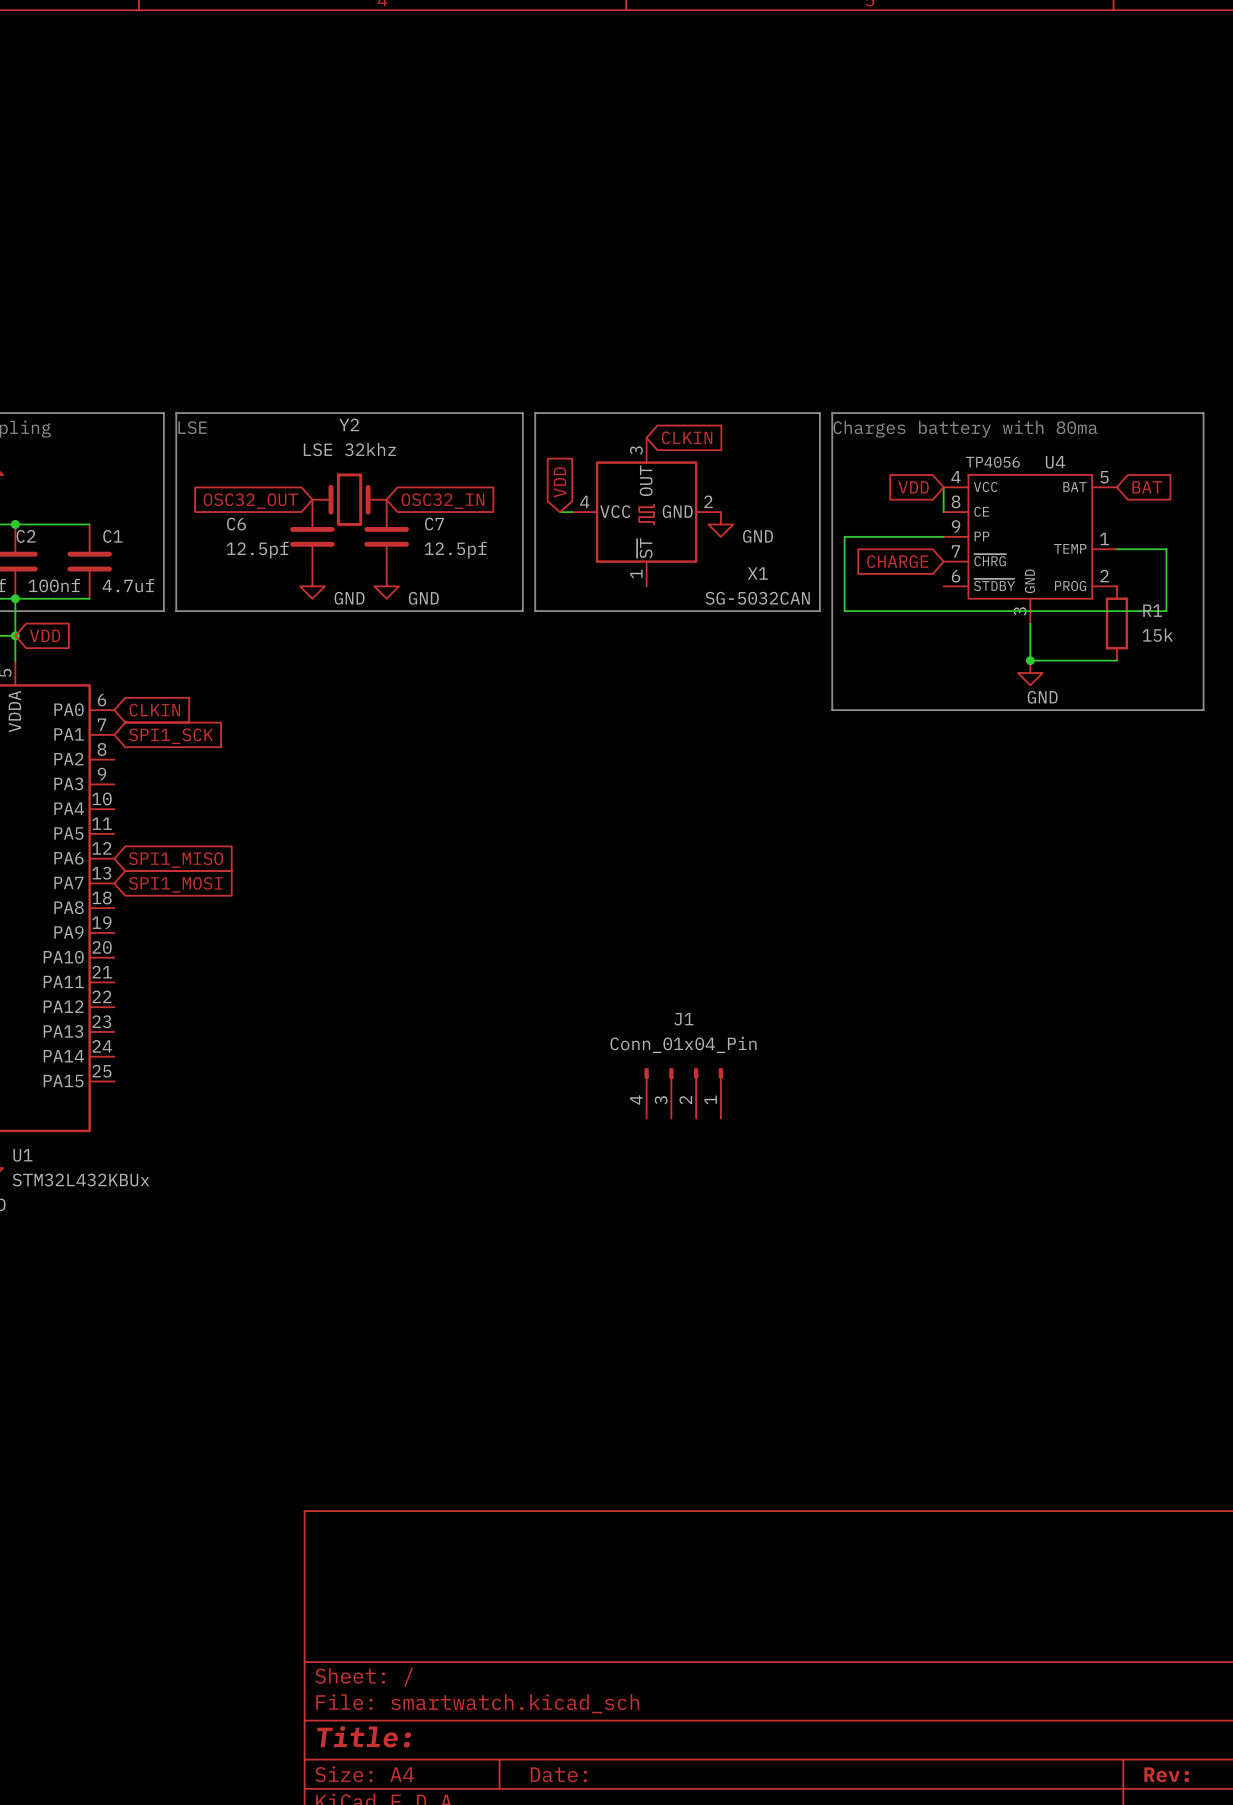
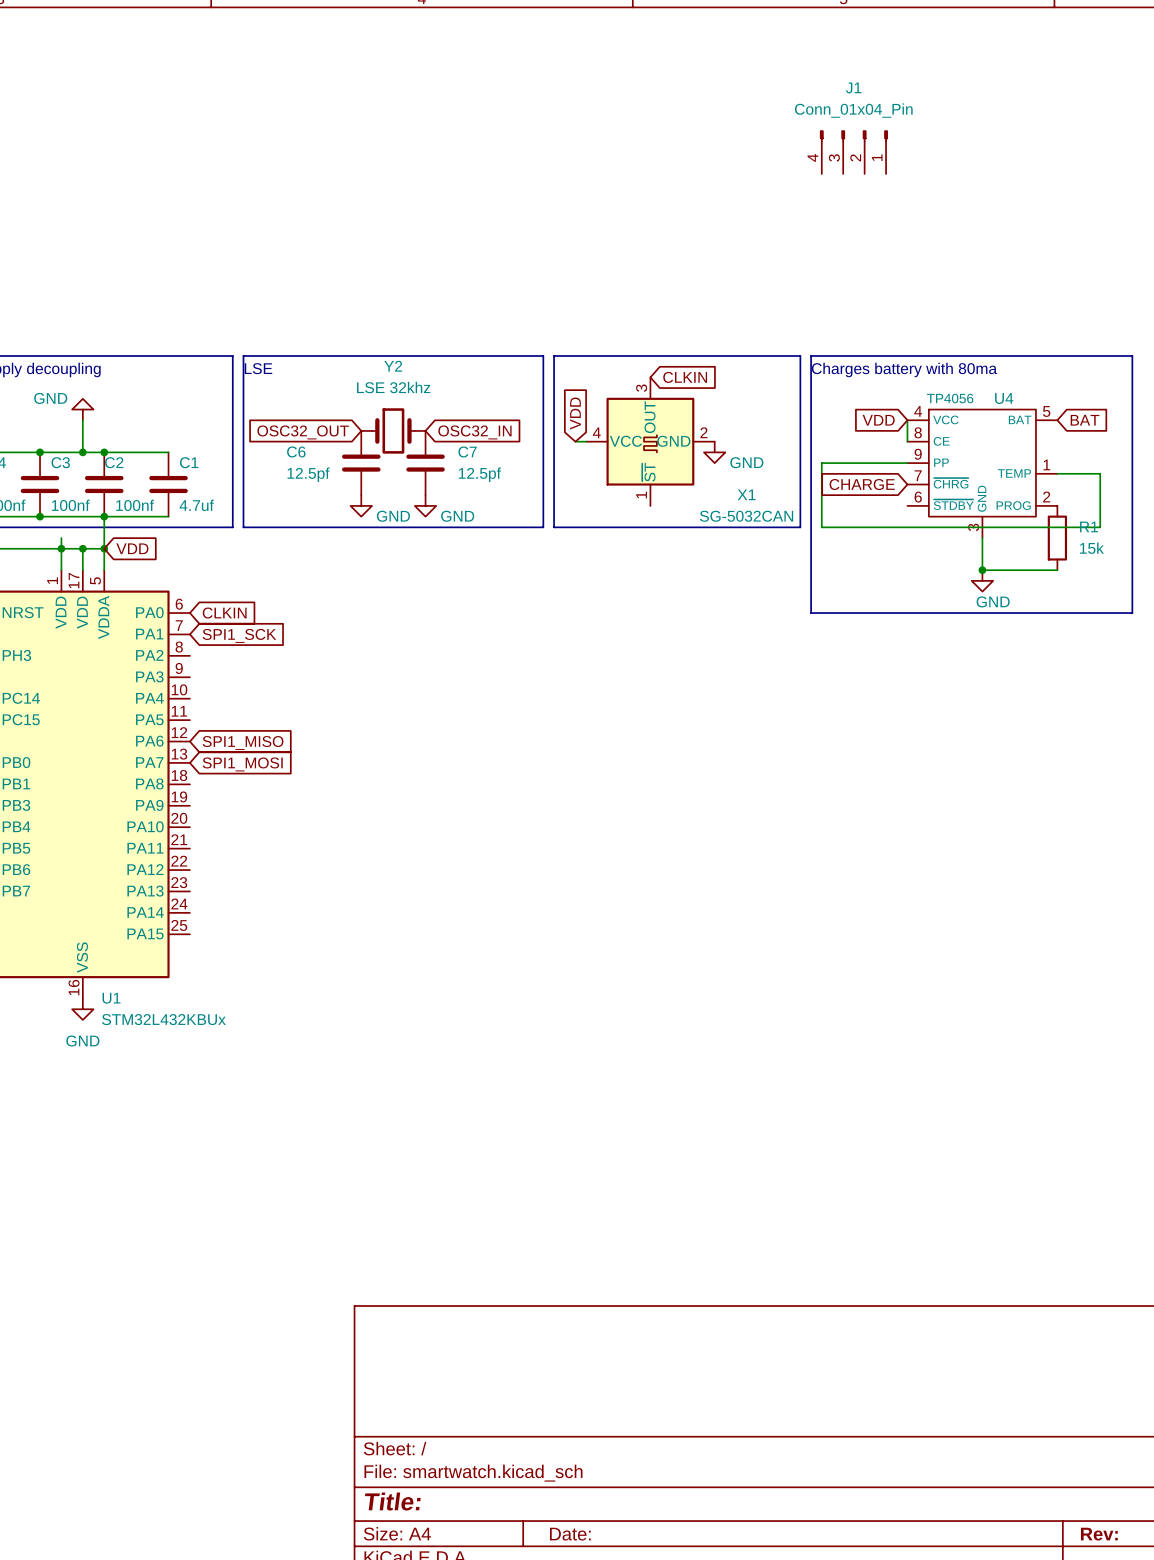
J1 position: (683, 1093) -> (853, 152)

